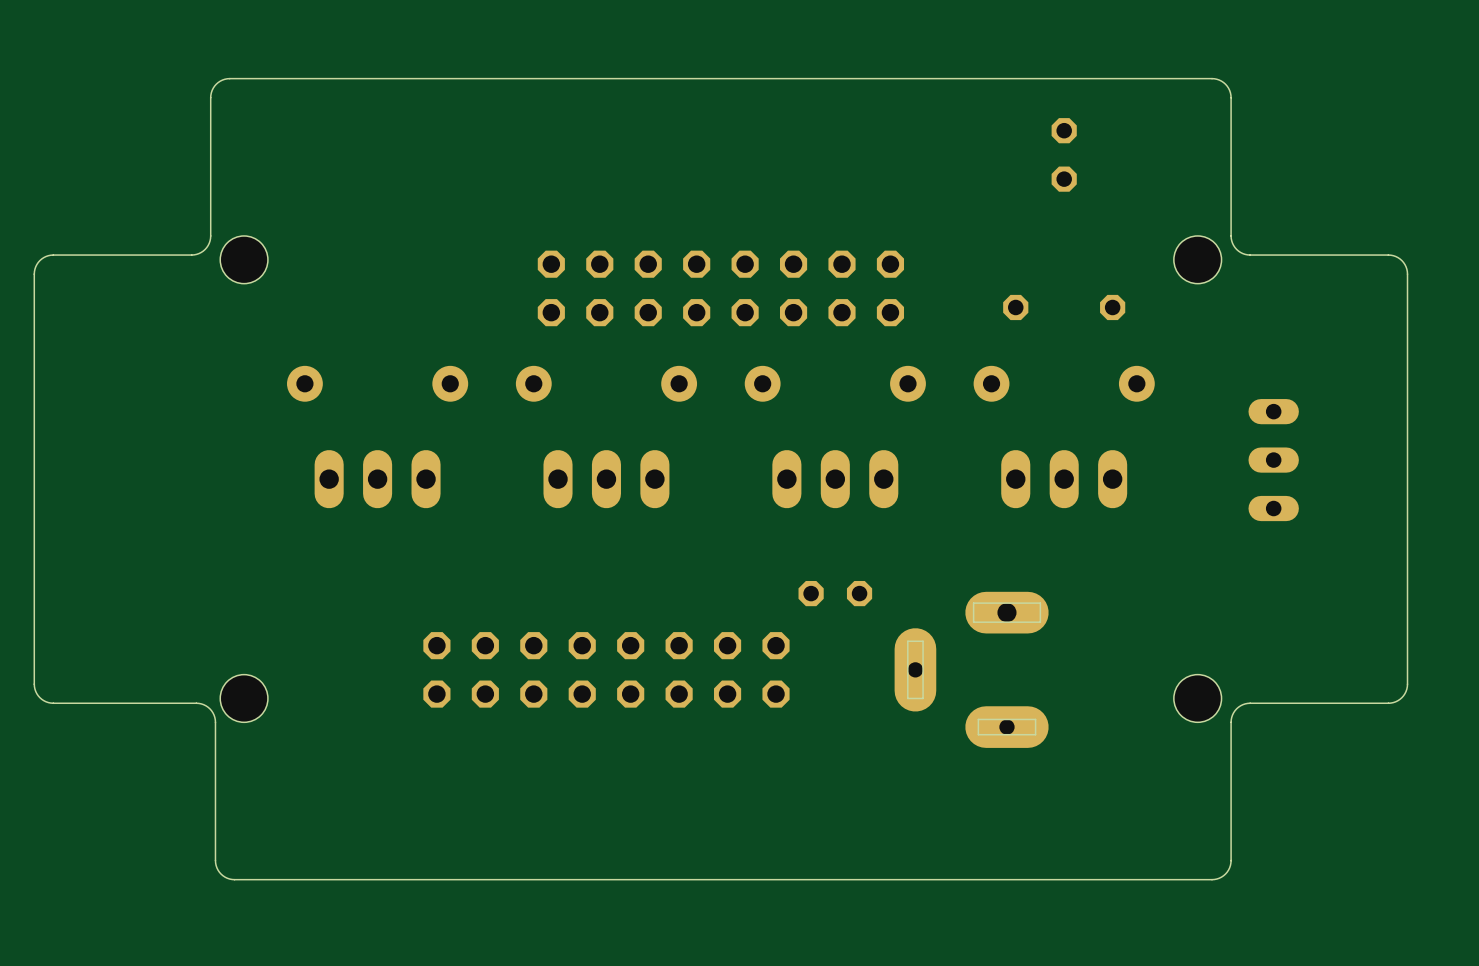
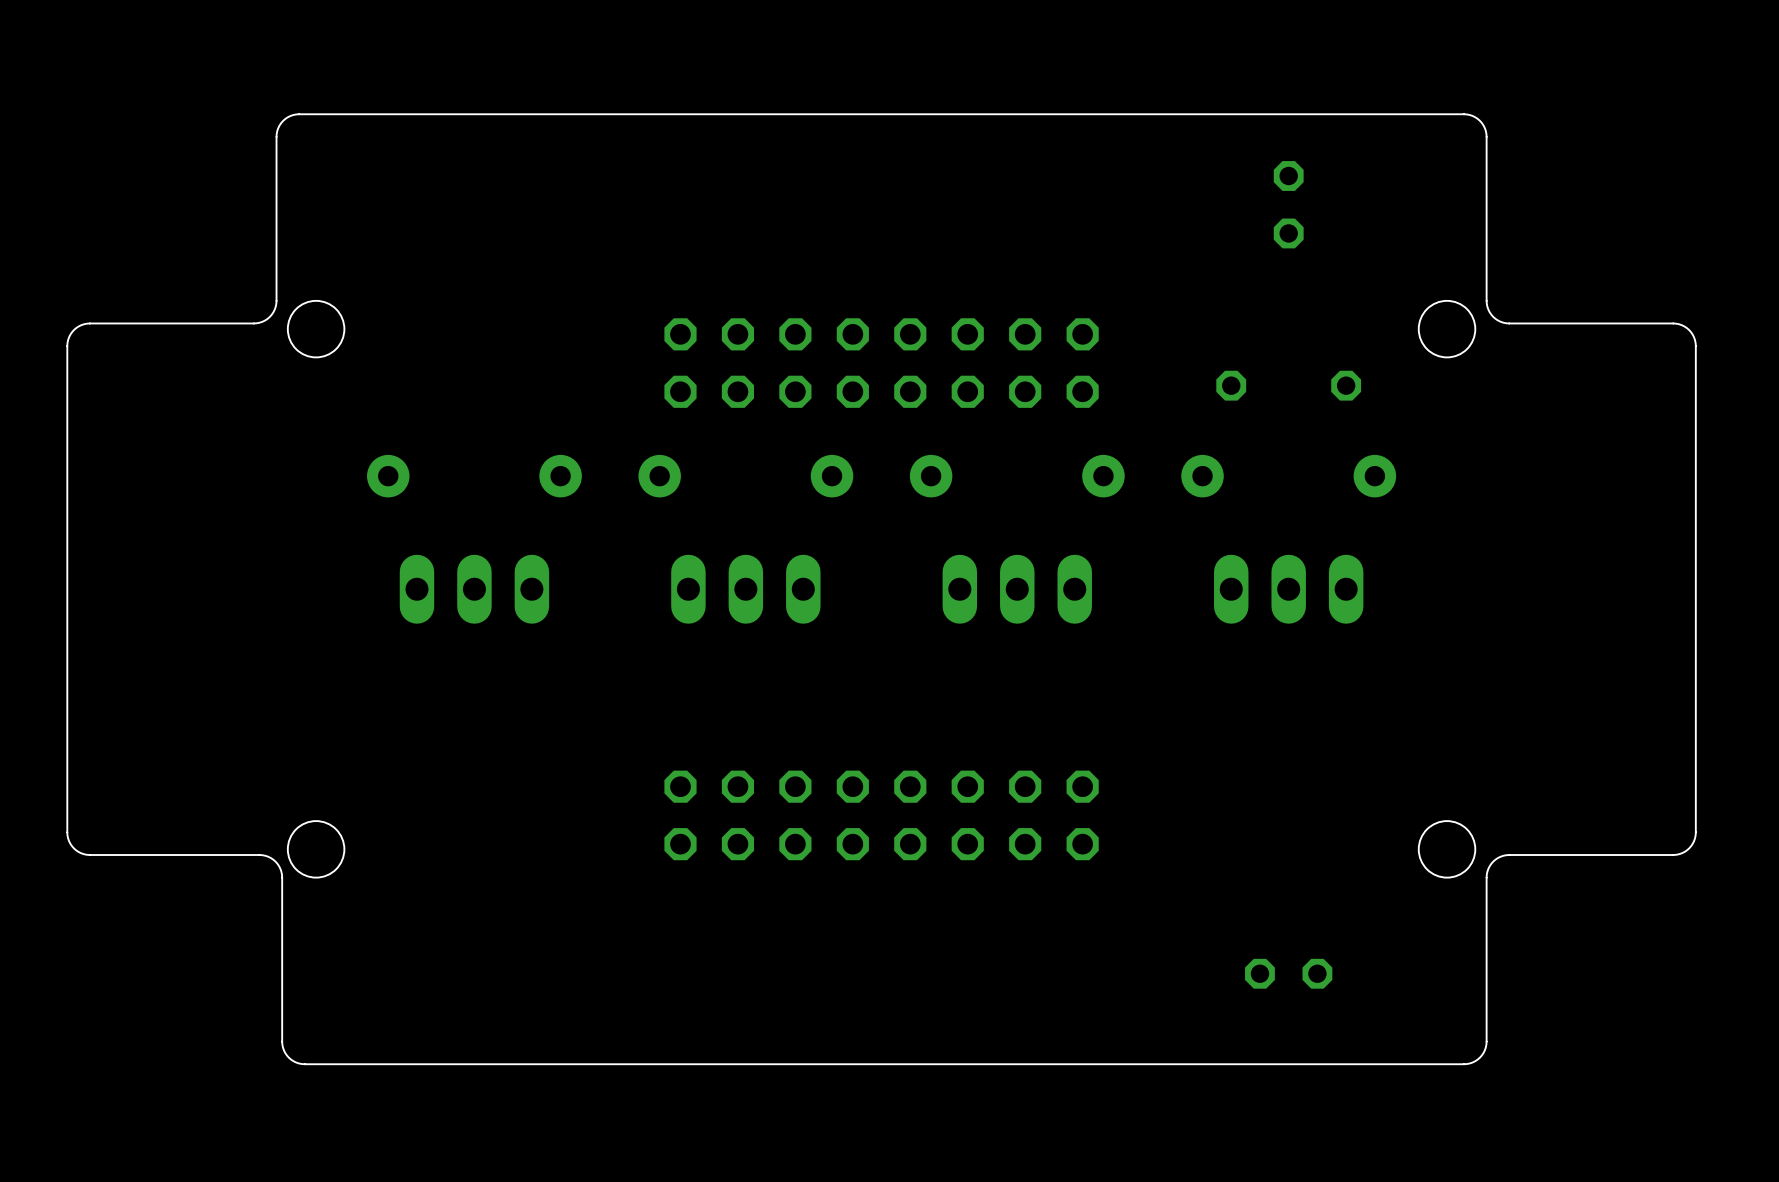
part: (1273, 460) -> none
part position: (835, 593) -> (1288, 973)
part position: (606, 669) -> (881, 815)
part: (971, 669) -> none

